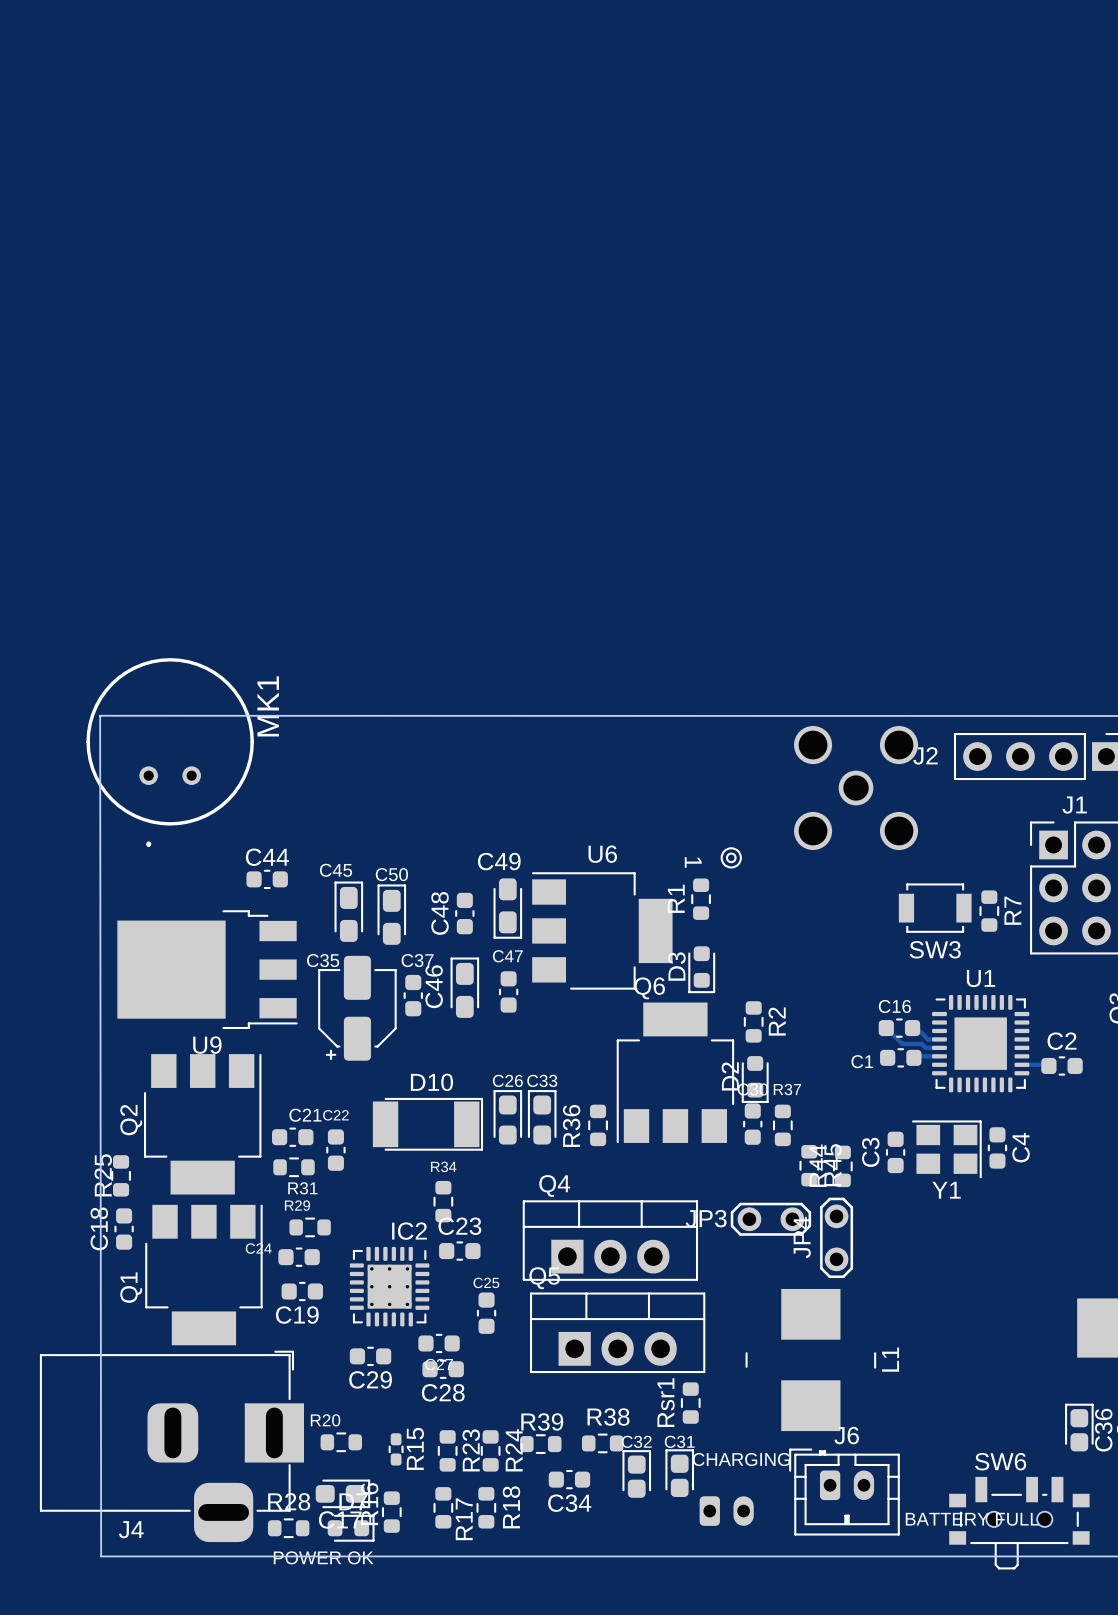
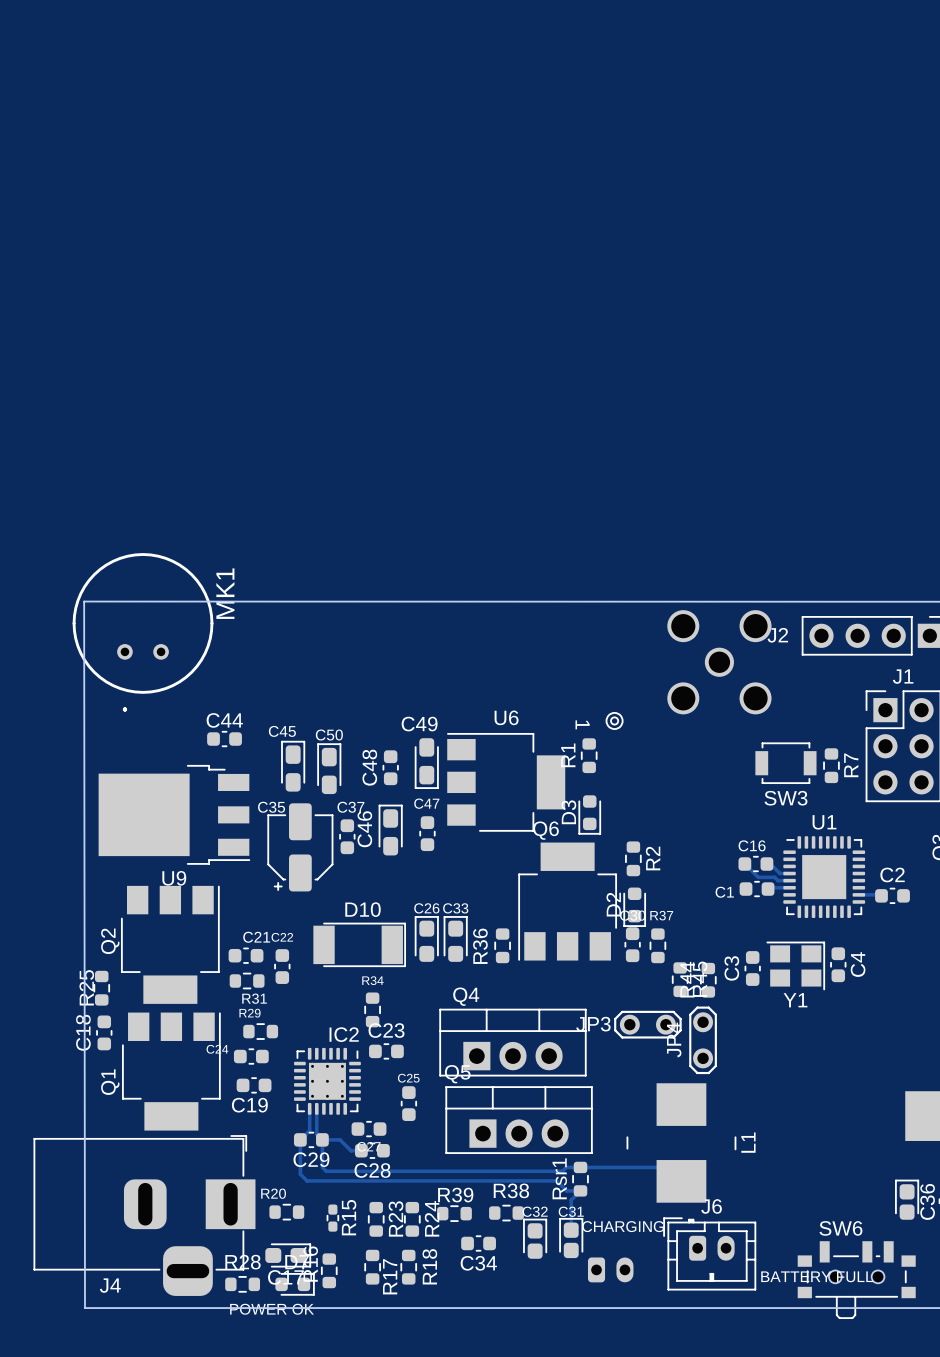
track: none -> (309, 1108) (309, 1130) (300, 1139) (300, 1174) (307, 1180) (556, 1180) (566, 1190) (580, 1190) (571, 1200) (571, 1230)
track: none -> (316, 1108) (316, 1134) (322, 1139)
track: none -> (322, 1139) (322, 1167) (326, 1171) (562, 1171) (566, 1167) (667, 1167) (681, 1181)
track: none -> (322, 1139) (340, 1139) (350, 1150) (361, 1150)

